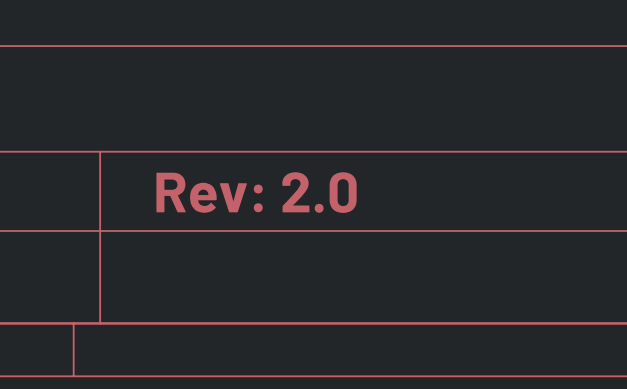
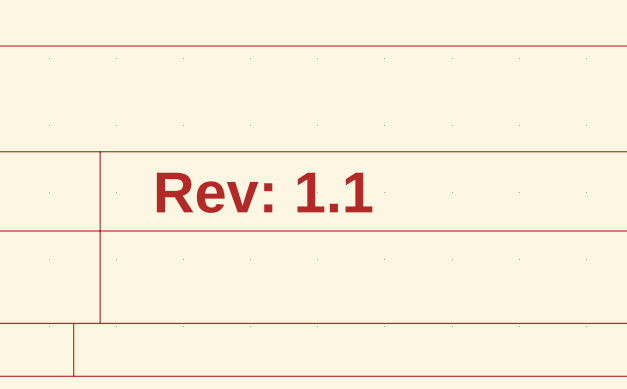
title block: Rev: 2.0 (256, 192) -> Rev: 1.1 (264, 192)

